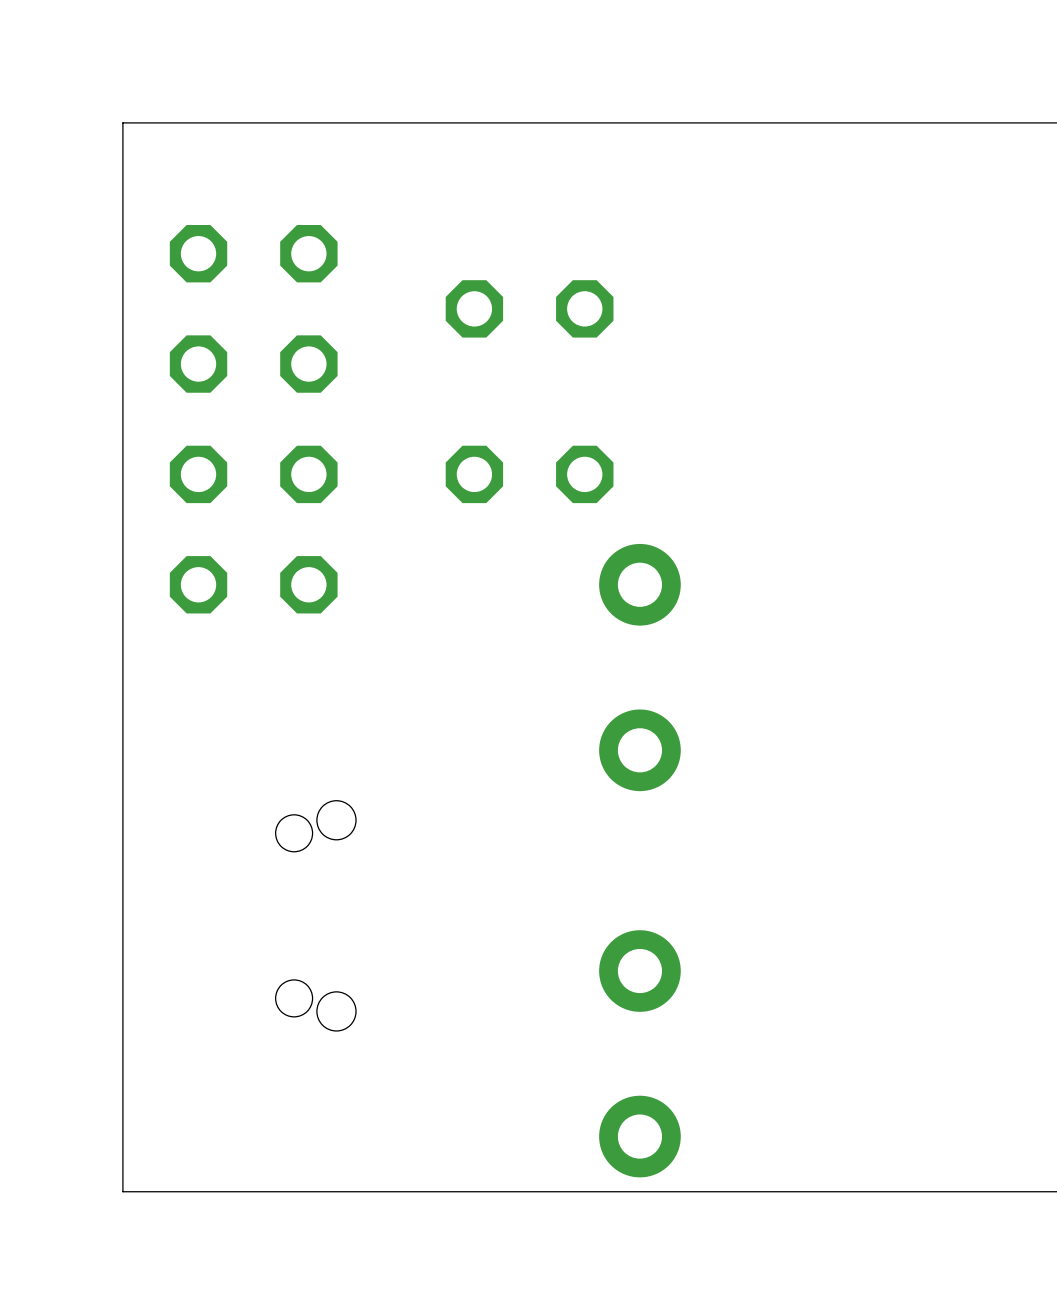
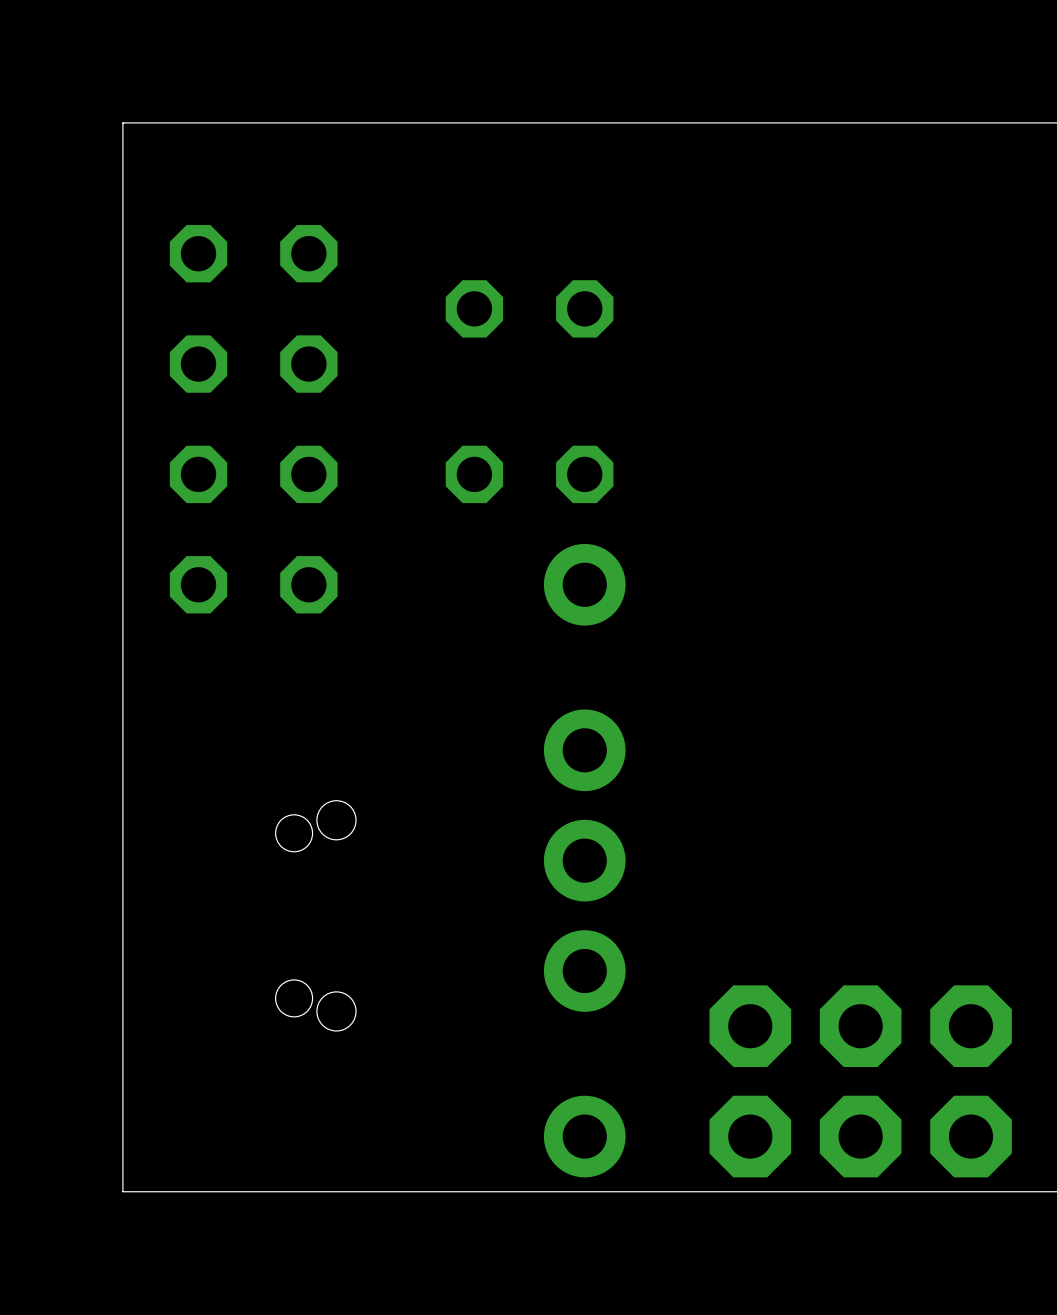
part position: (639, 584) -> (584, 584)
part position: (639, 750) -> (584, 750)
part: none -> (584, 860)
part position: (639, 971) -> (584, 971)
part: none -> (860, 1081)
part position: (639, 1136) -> (584, 1136)

